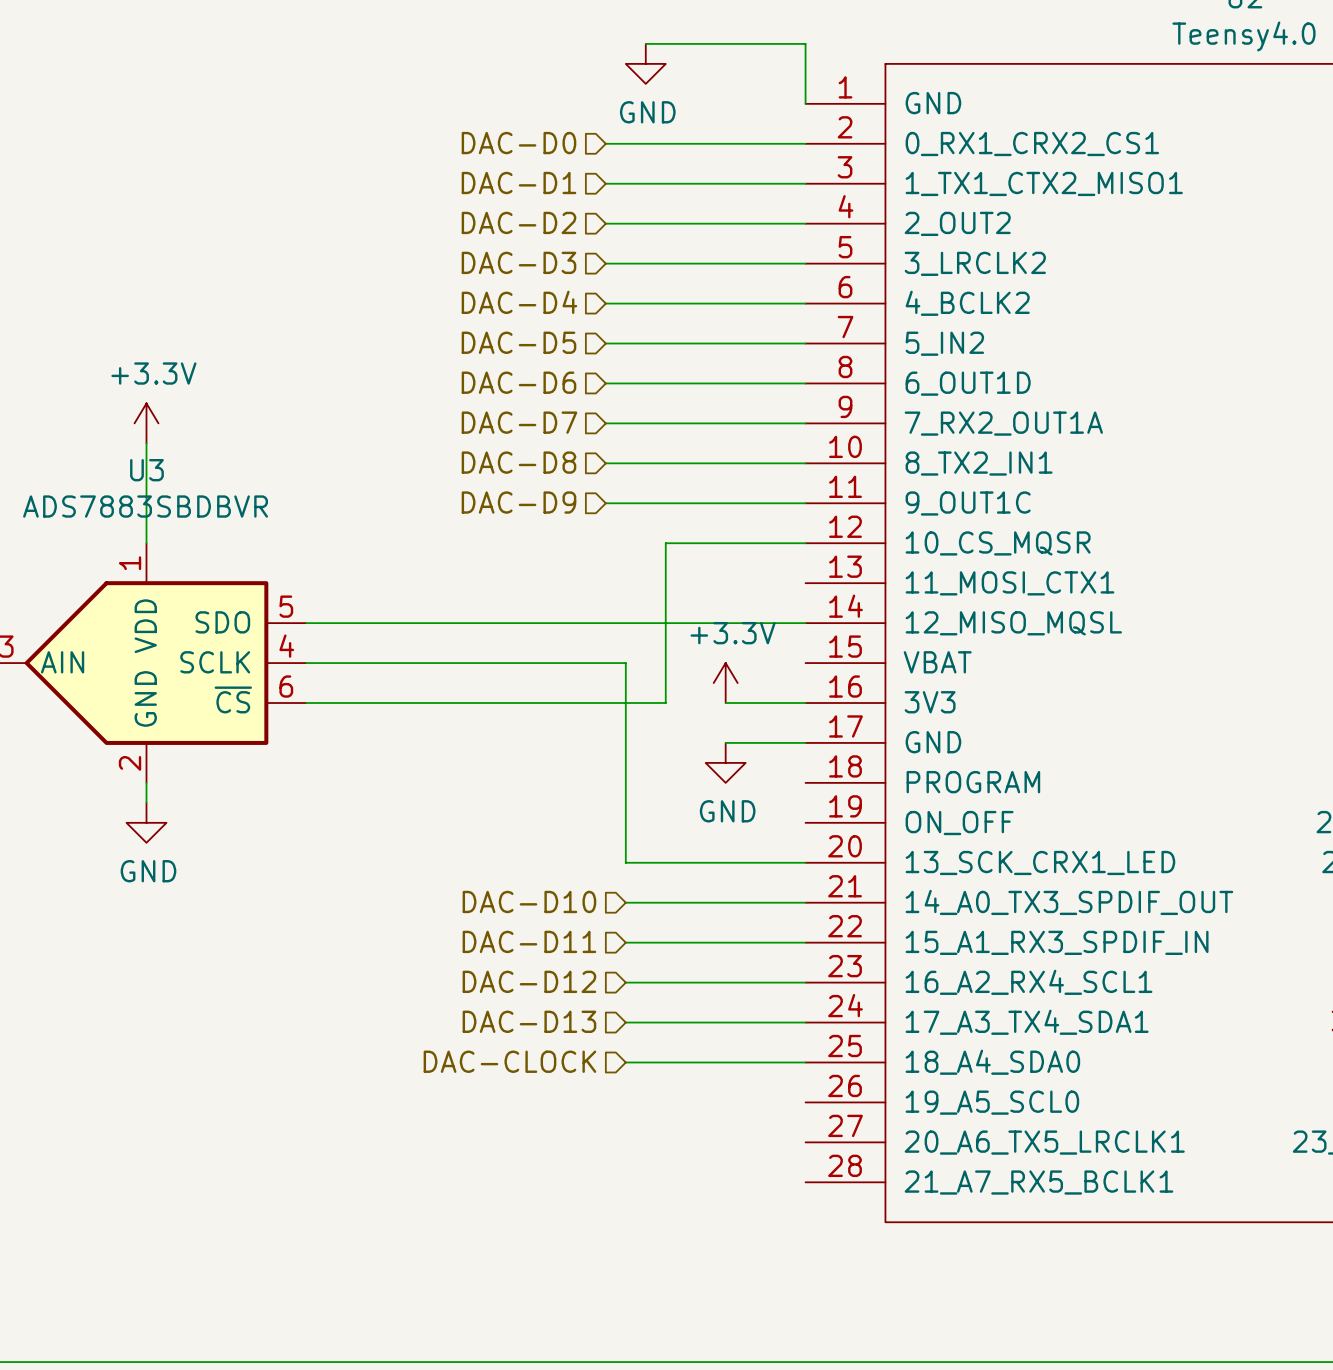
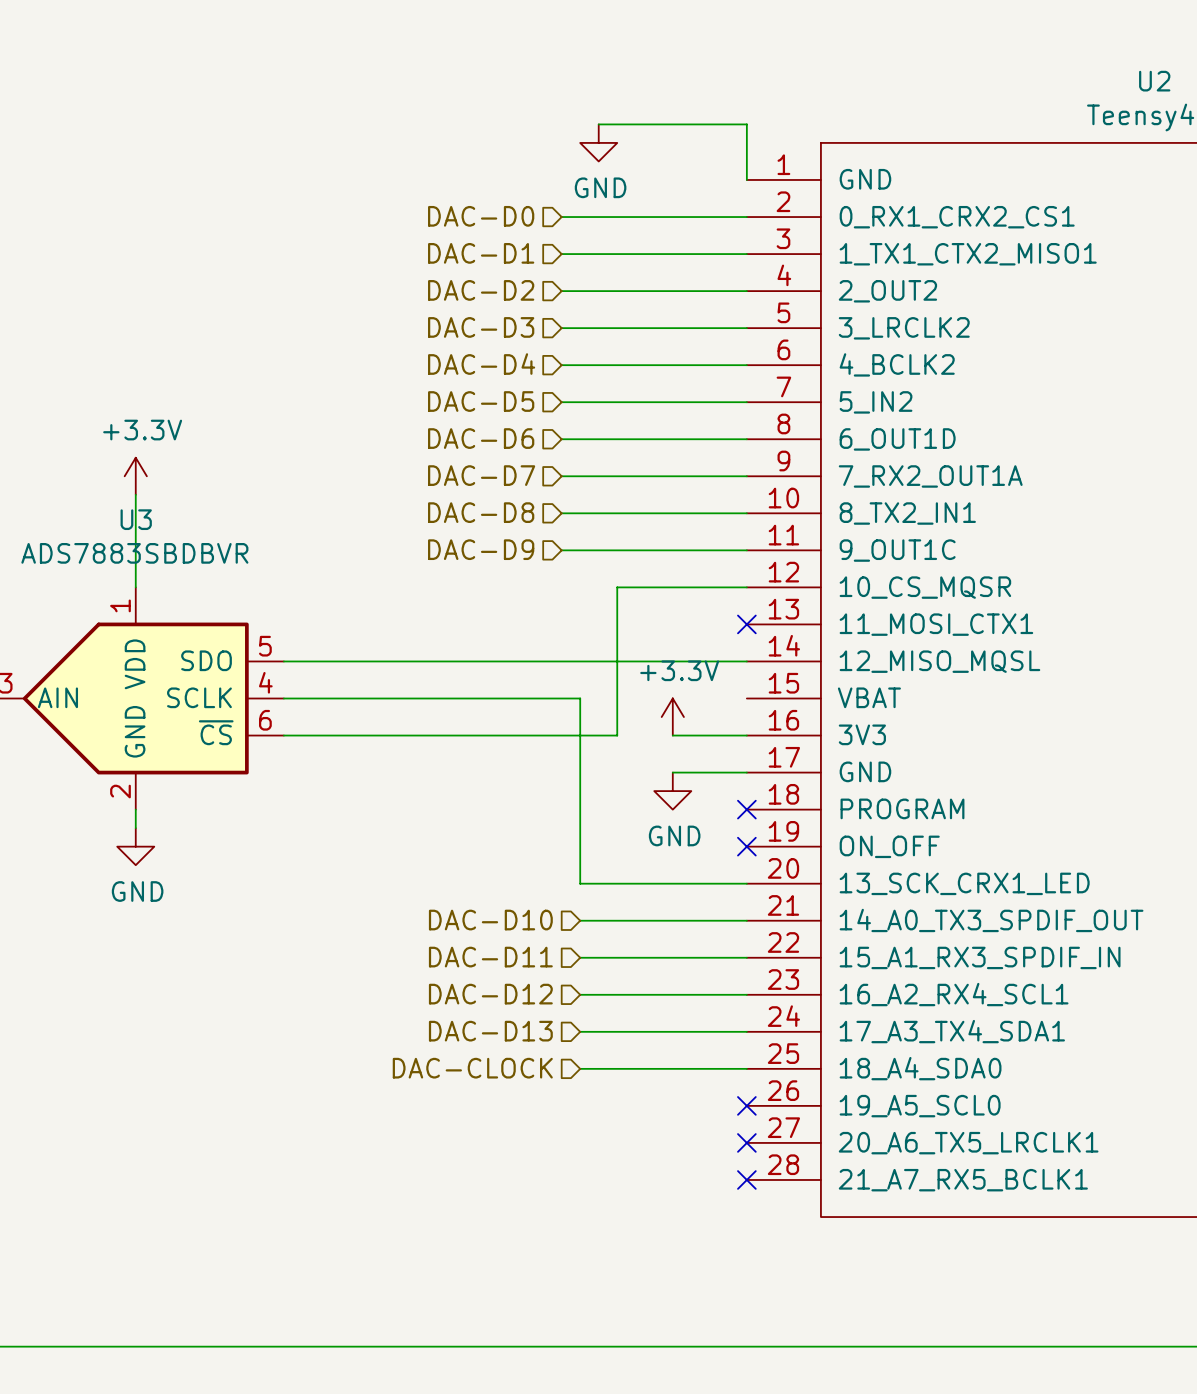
no-connect mark: none -> (746, 624)
no-connect mark: none -> (746, 809)
no-connect mark: none -> (746, 846)
no-connect mark: none -> (746, 1105)
no-connect mark: none -> (746, 1142)
no-connect mark: none -> (746, 1179)

